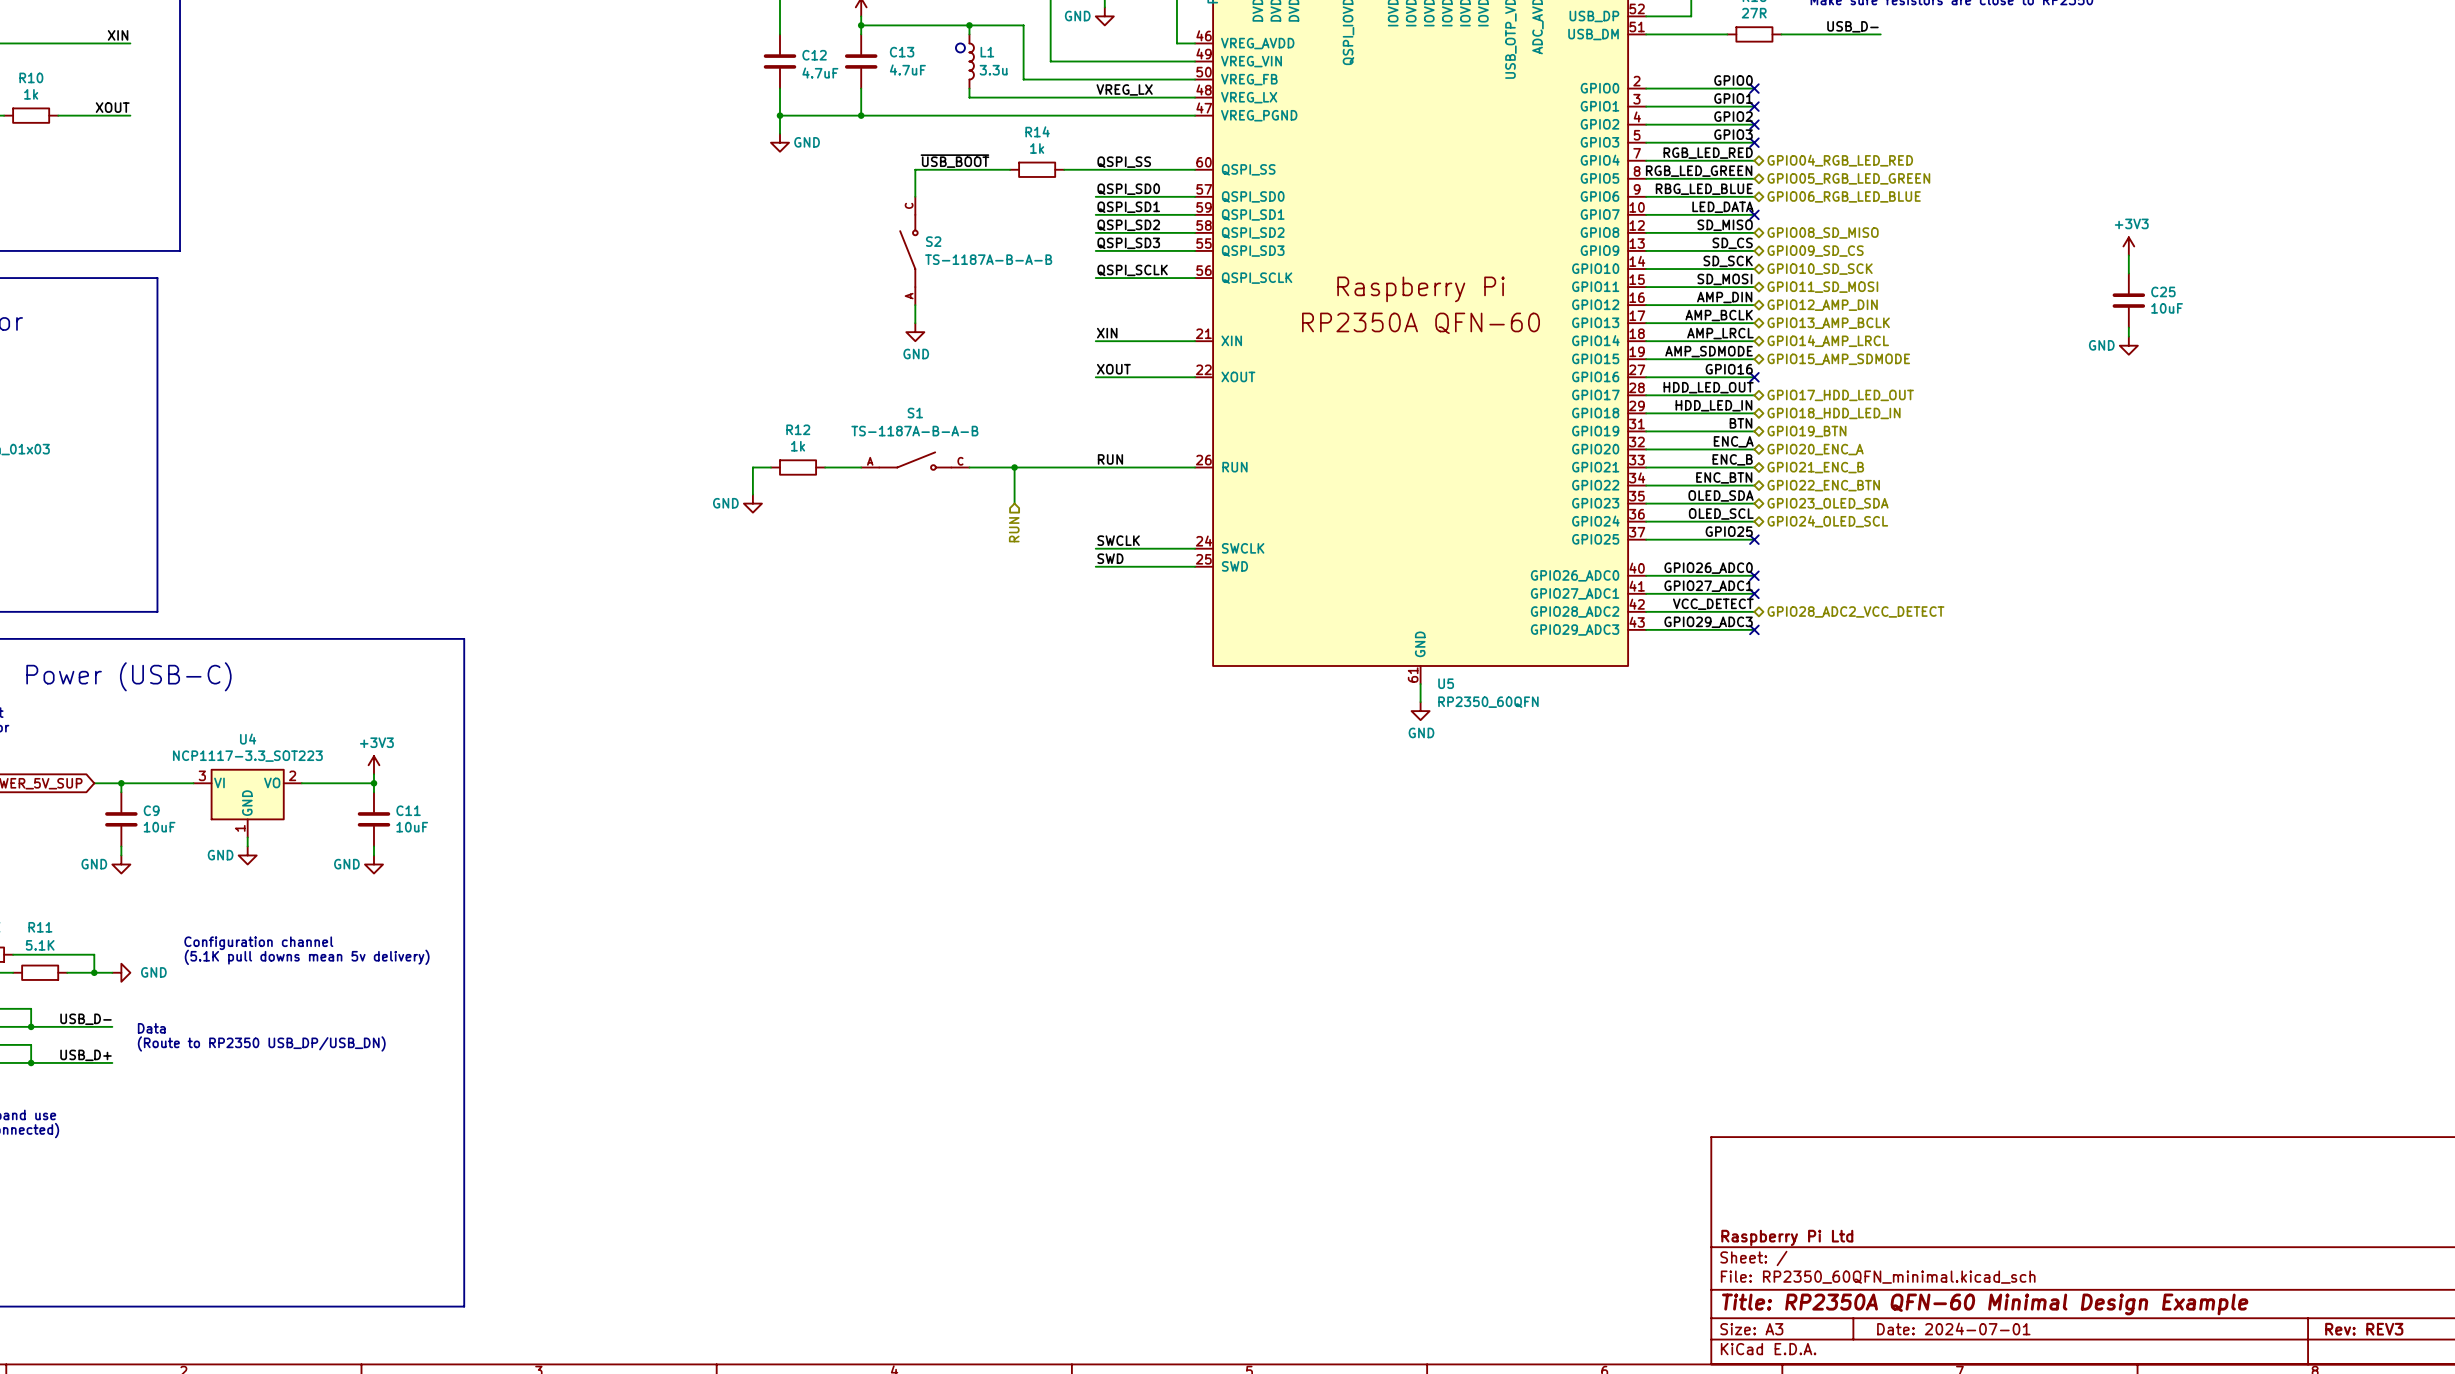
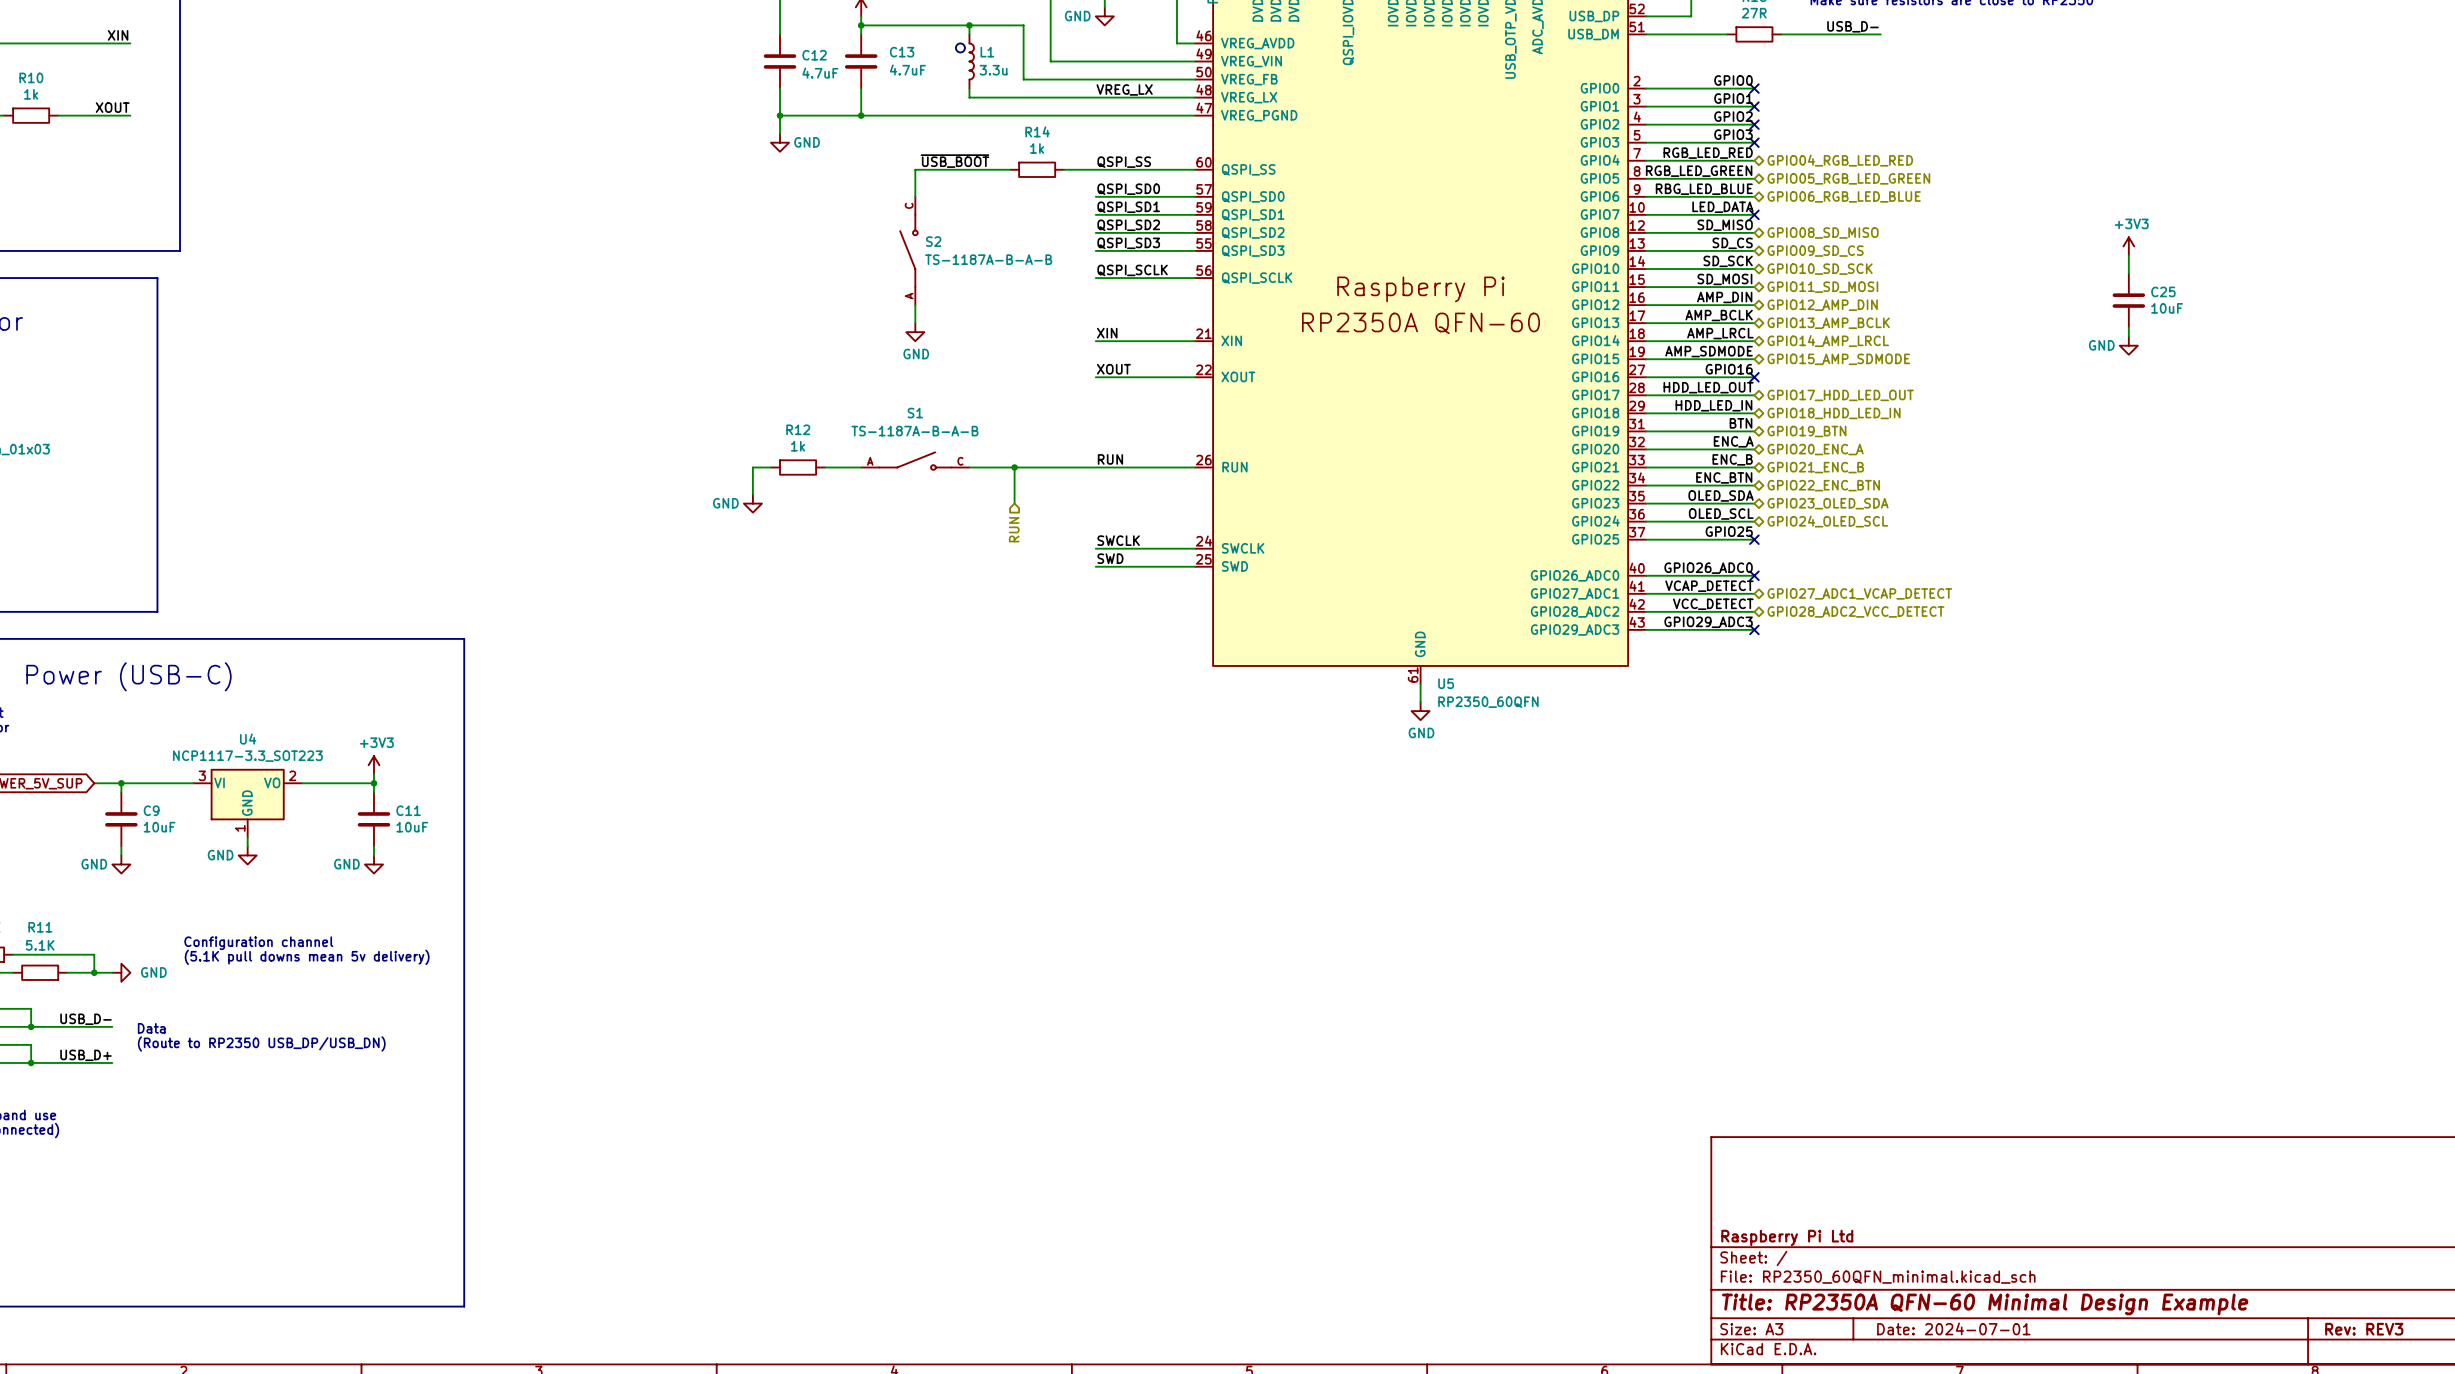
label: GPIO27_ADC1 (1708, 586) -> VCAP_DETECT (1709, 586)
no-connect mark: (1754, 593) -> none
hierarchical label: none -> GPIO27_ADC1_VCAP_DETECT (1859, 593)

